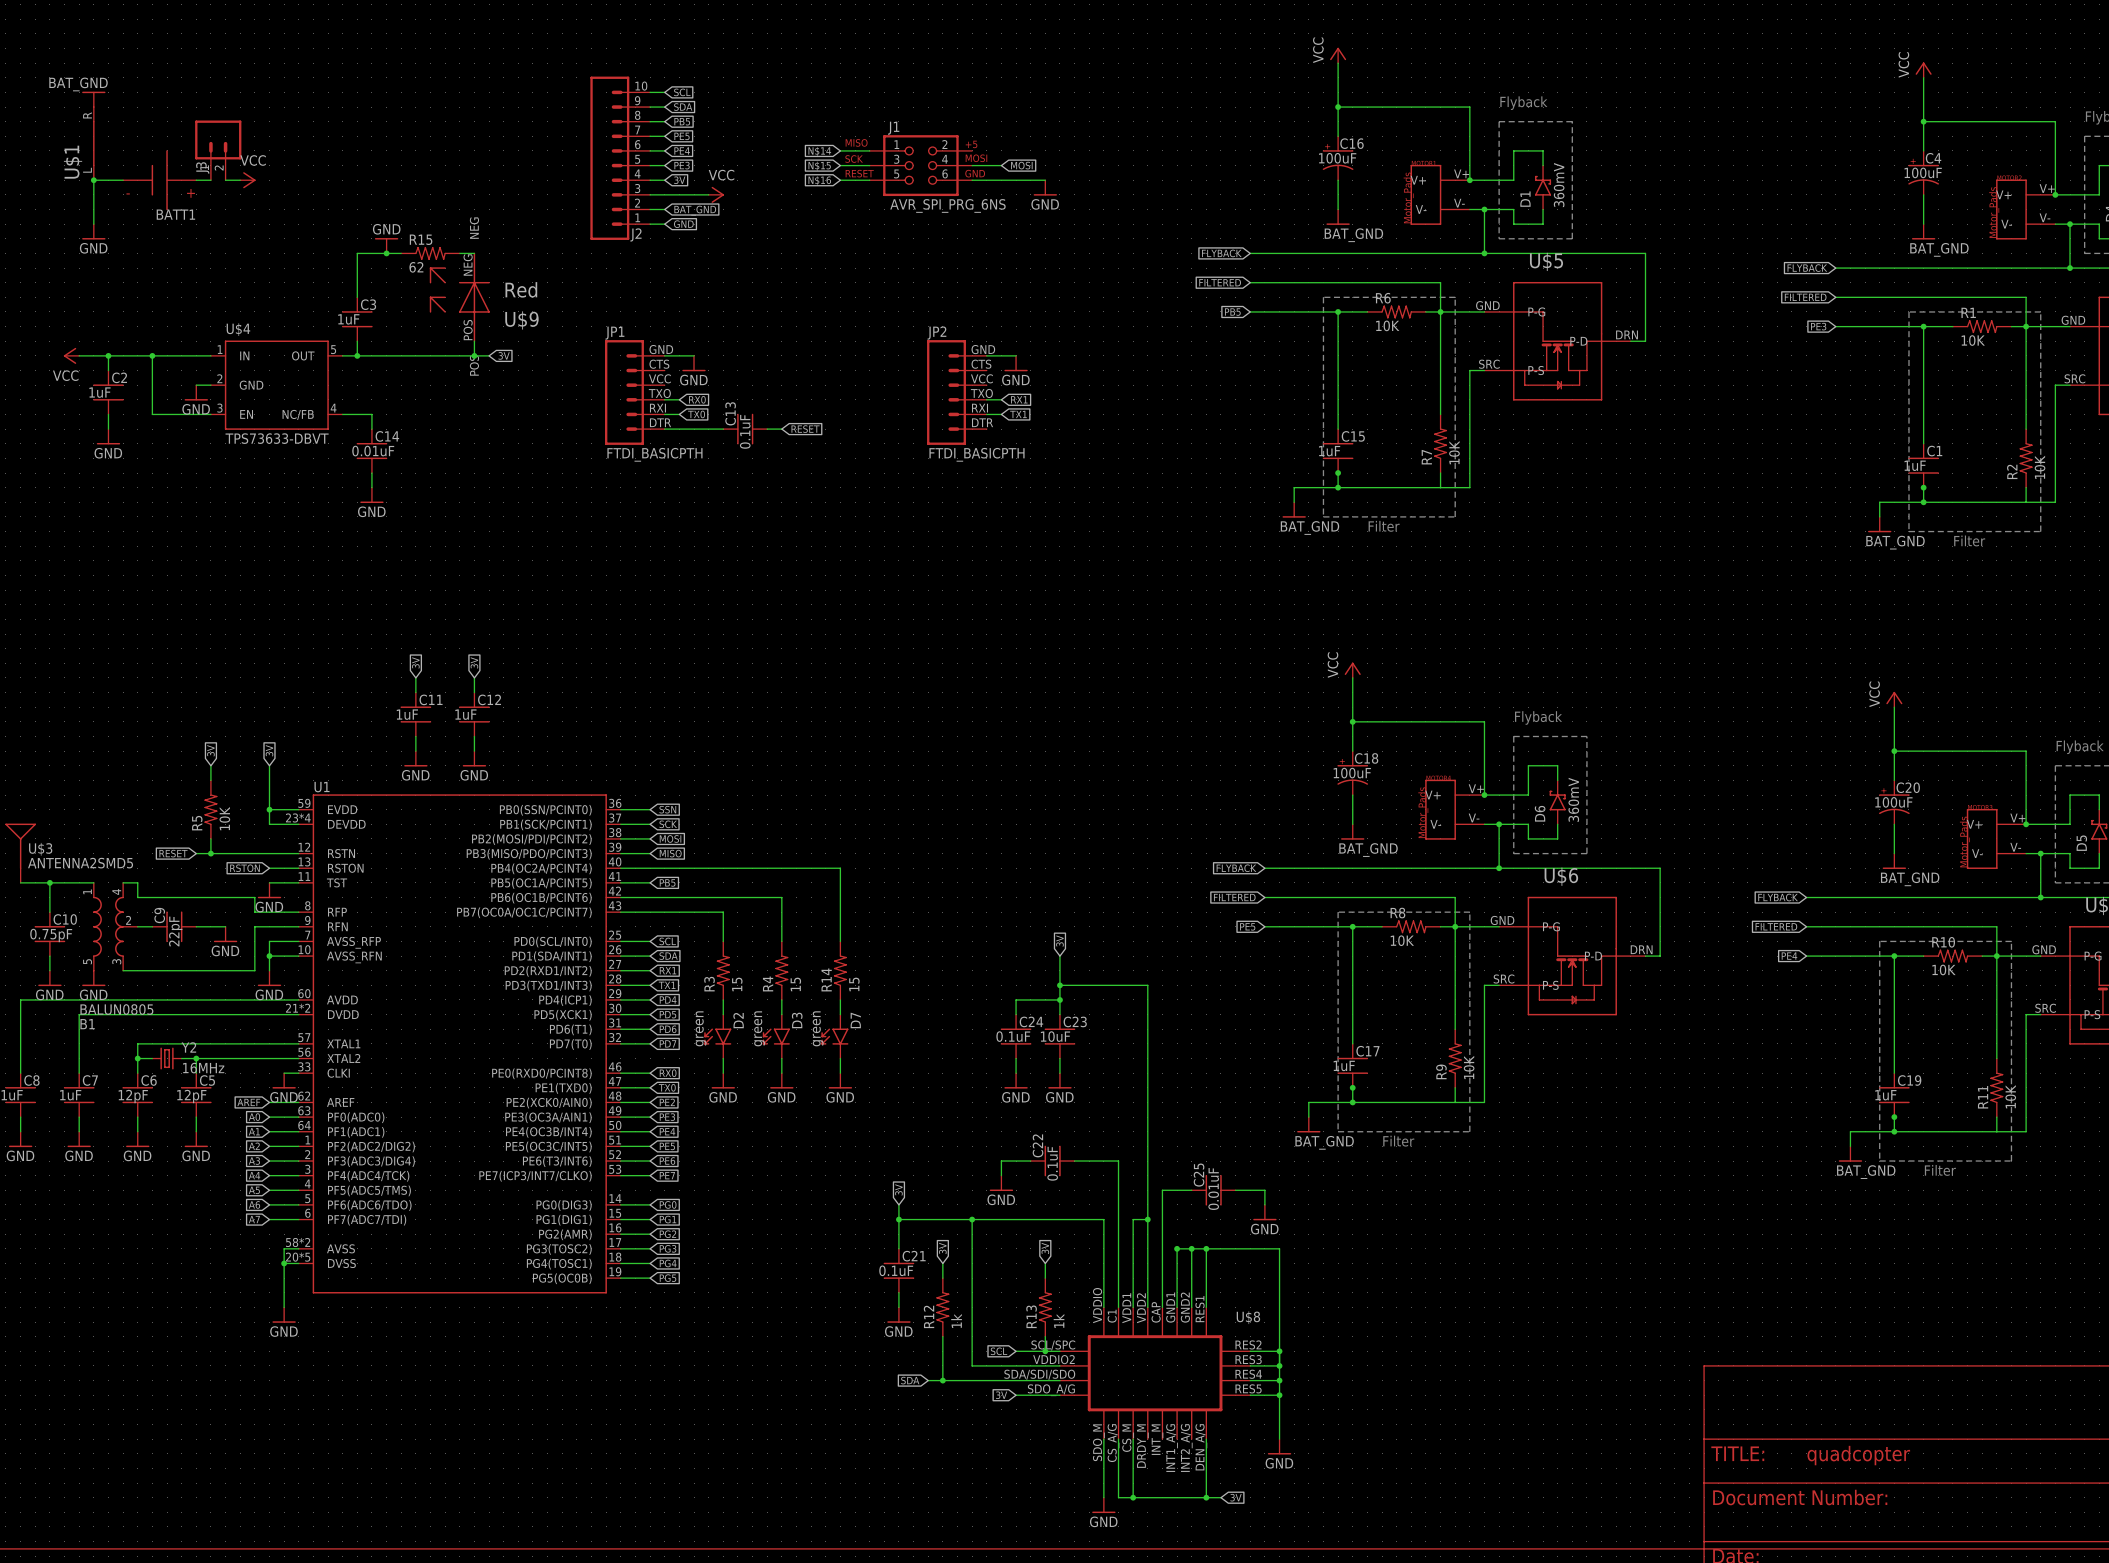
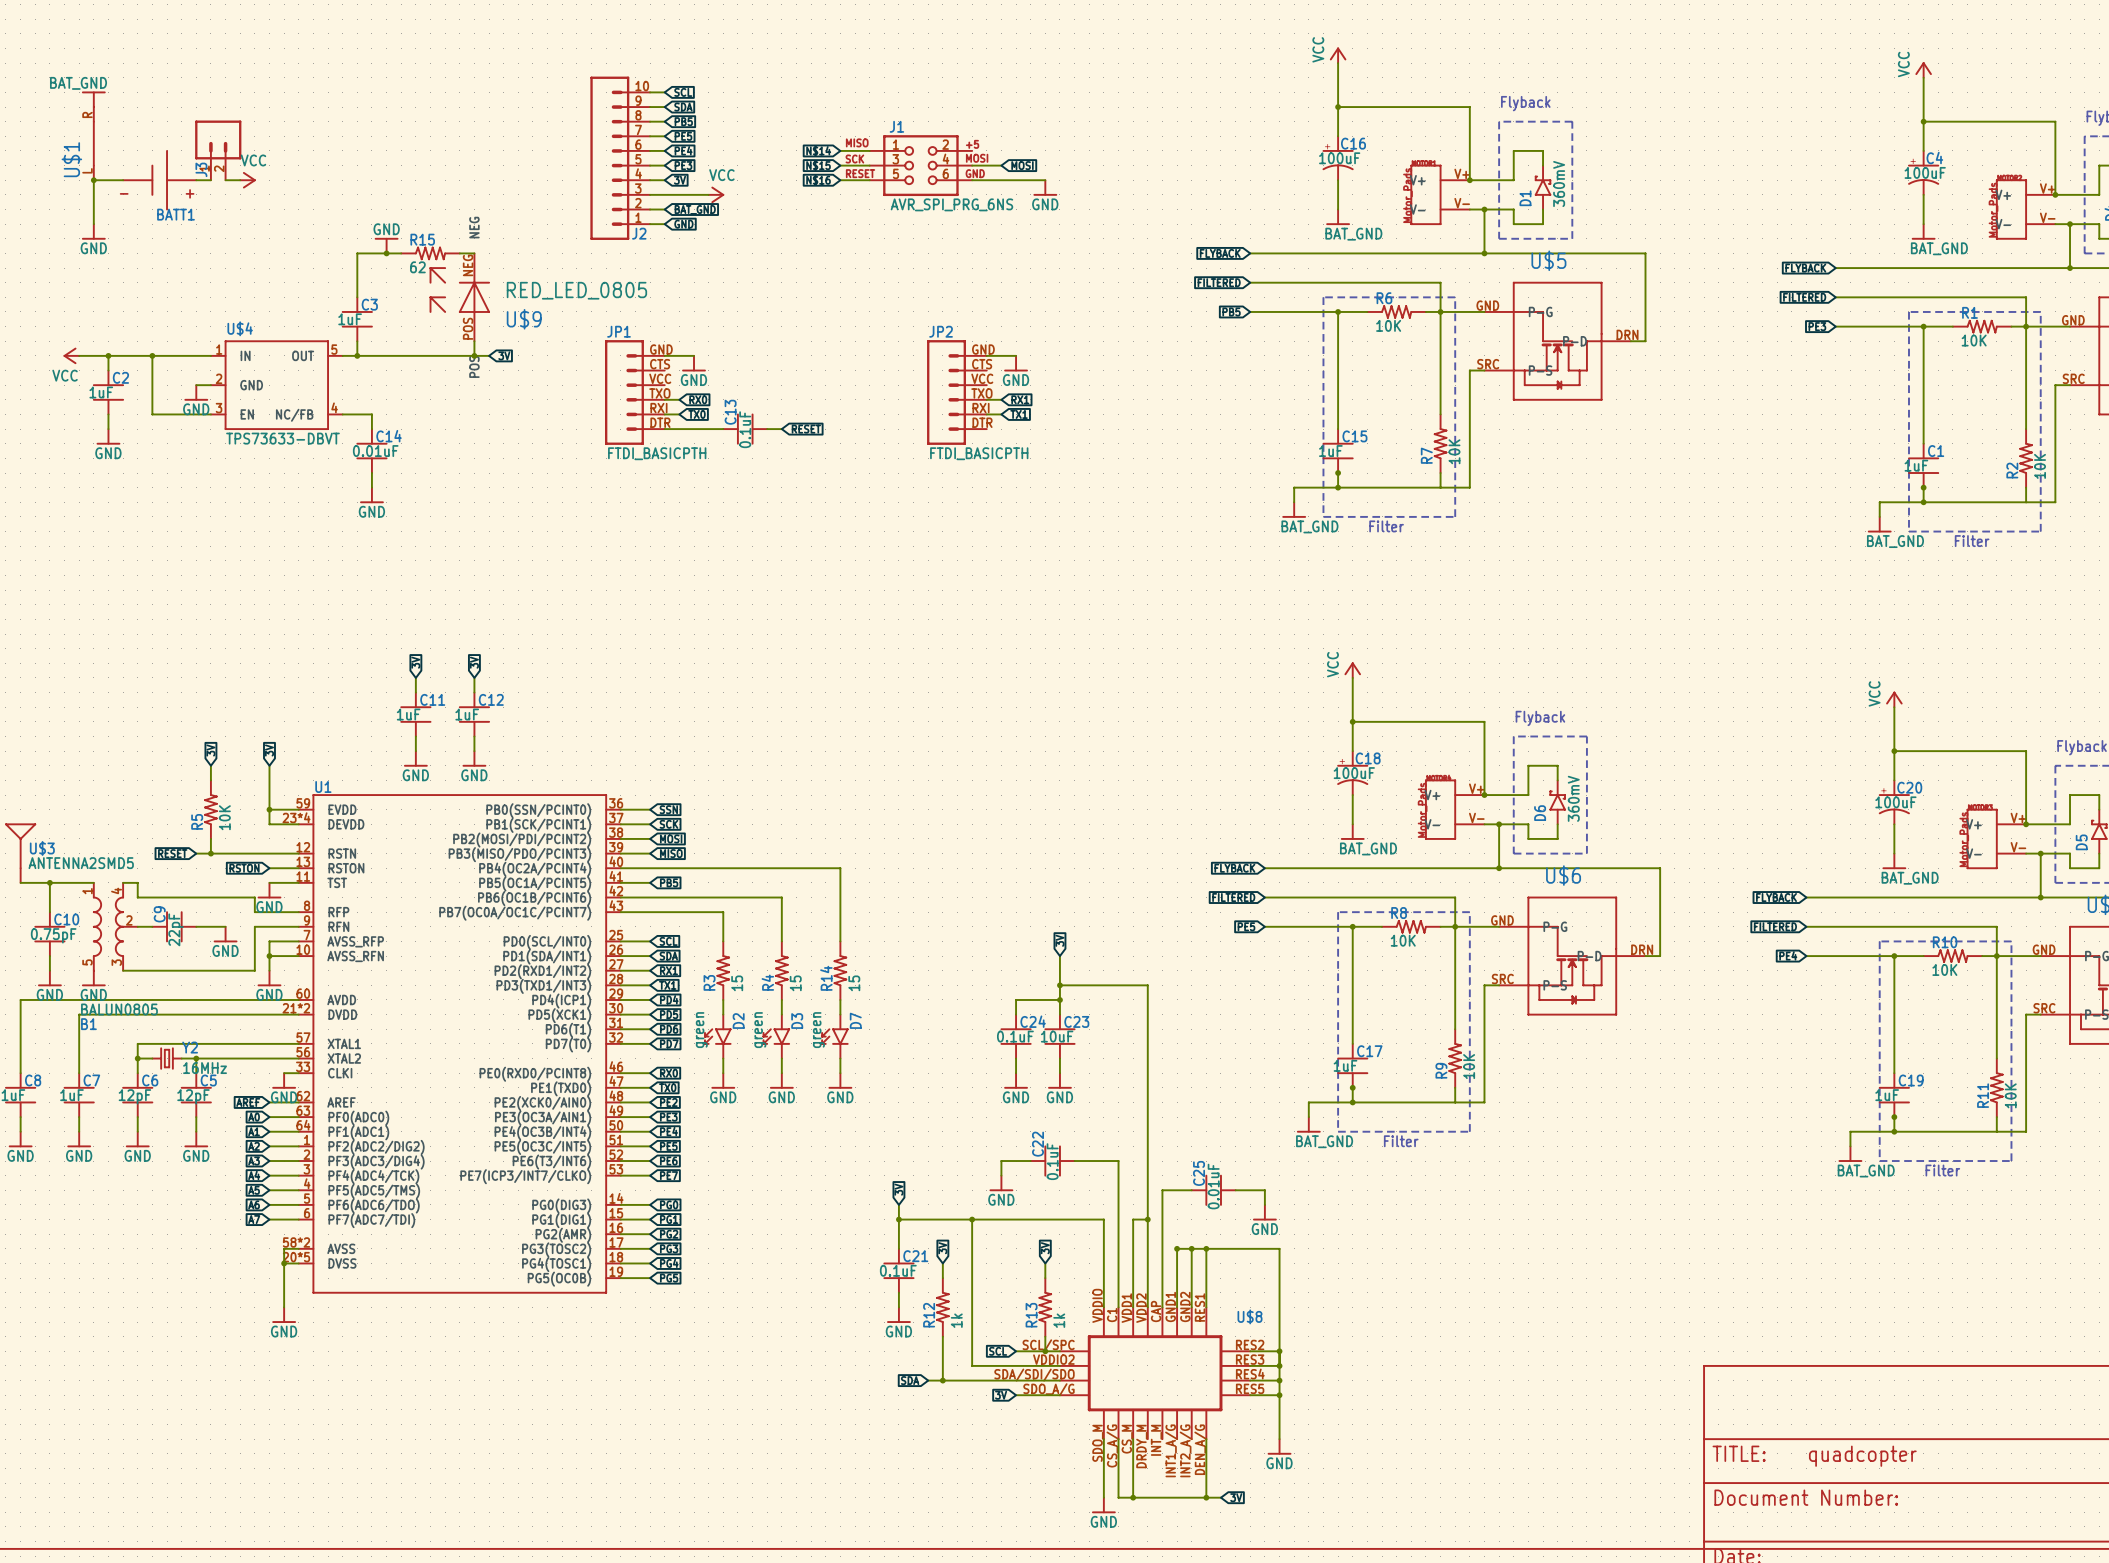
U$9 value: Red (521, 289) -> RED_LED_0805 (576, 290)

